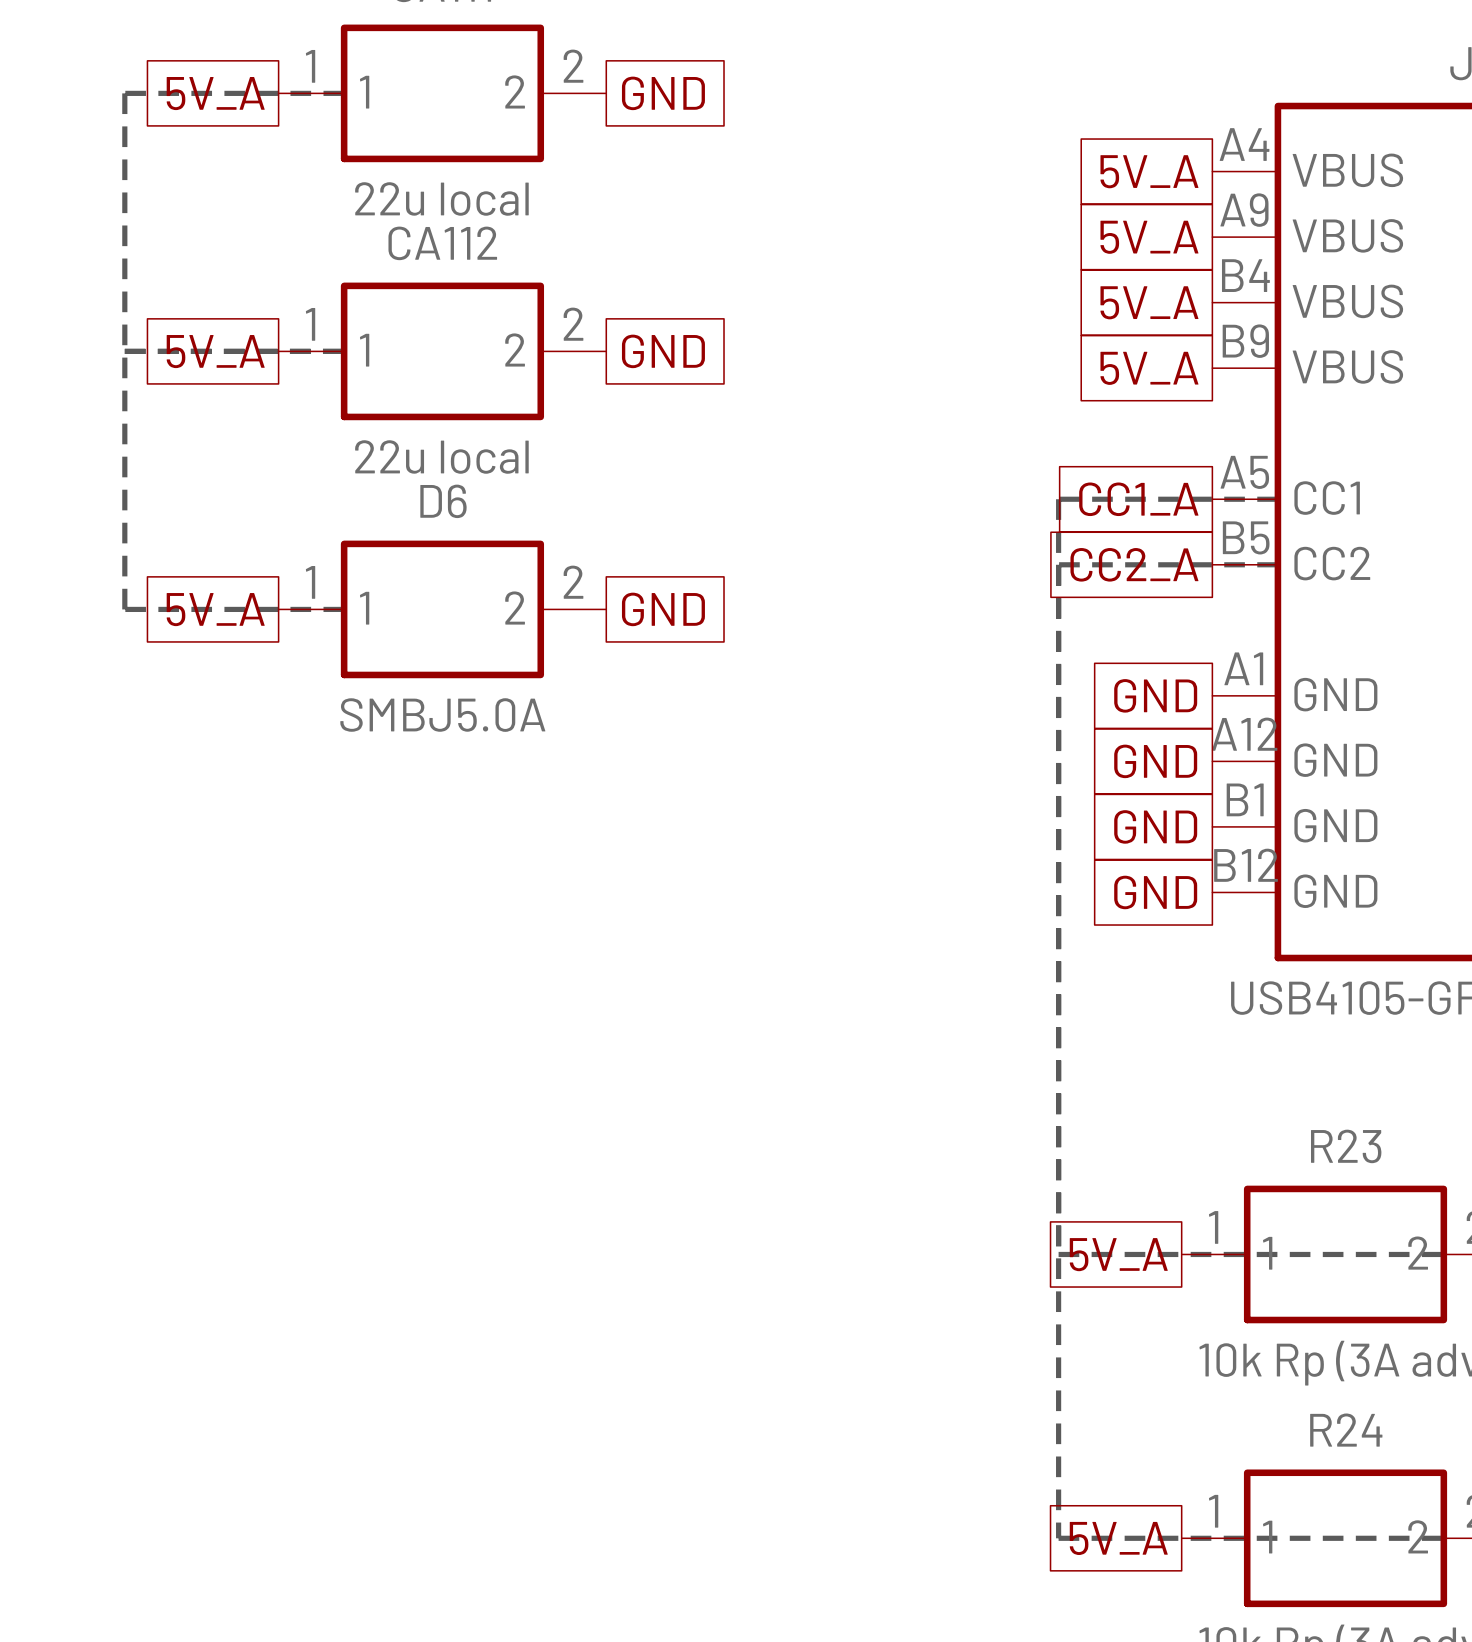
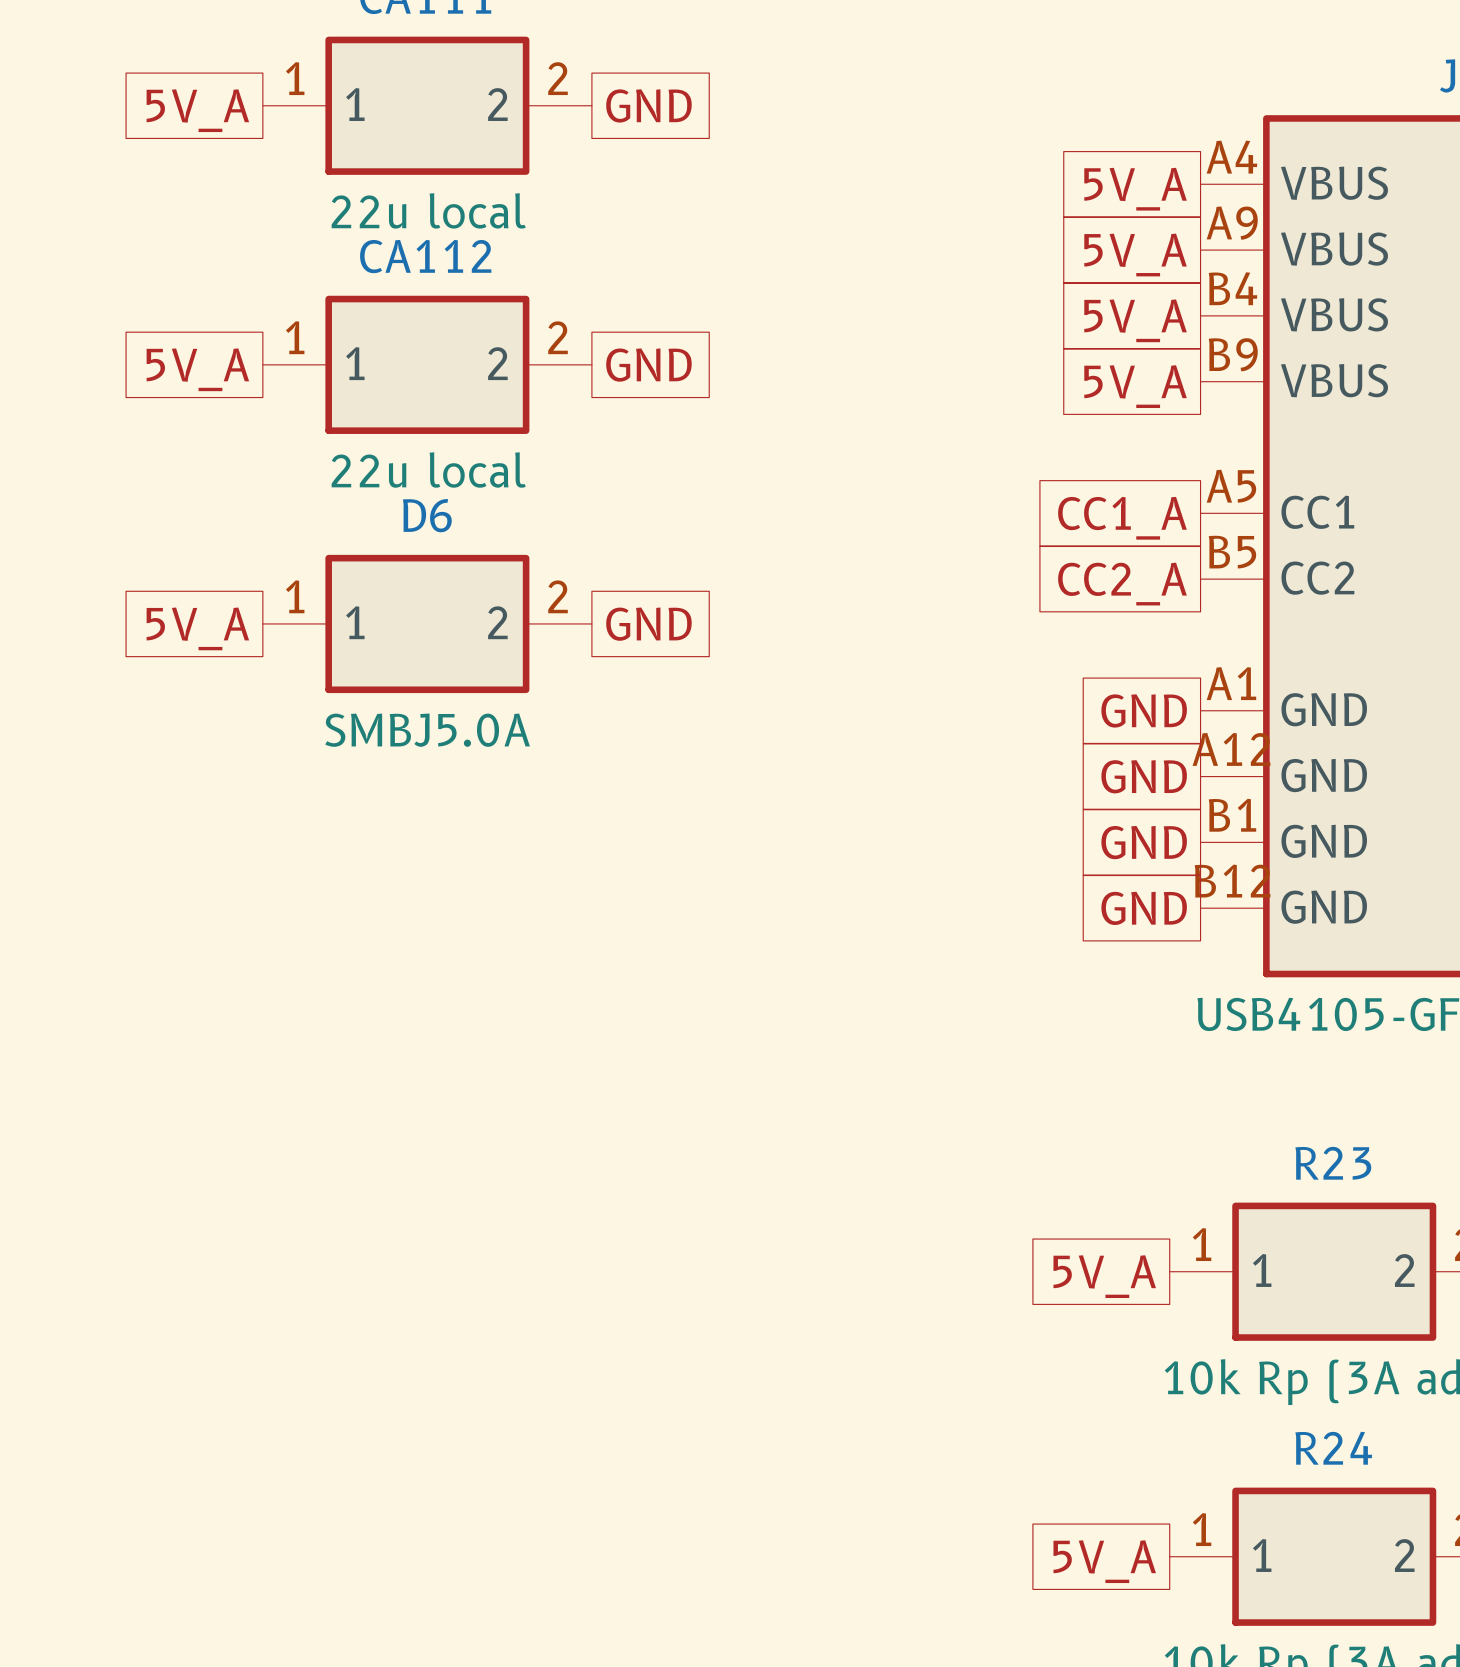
line: (344, 93) (124, 93) (124, 609) (344, 609) -> none
line: (124, 351) (344, 351) -> none
line: (1277, 499) (1058, 499) (1058, 1538) (1443, 1538) -> none
line: (1058, 564) (1277, 564) -> none
line: (1058, 1254) (1443, 1254) -> none

